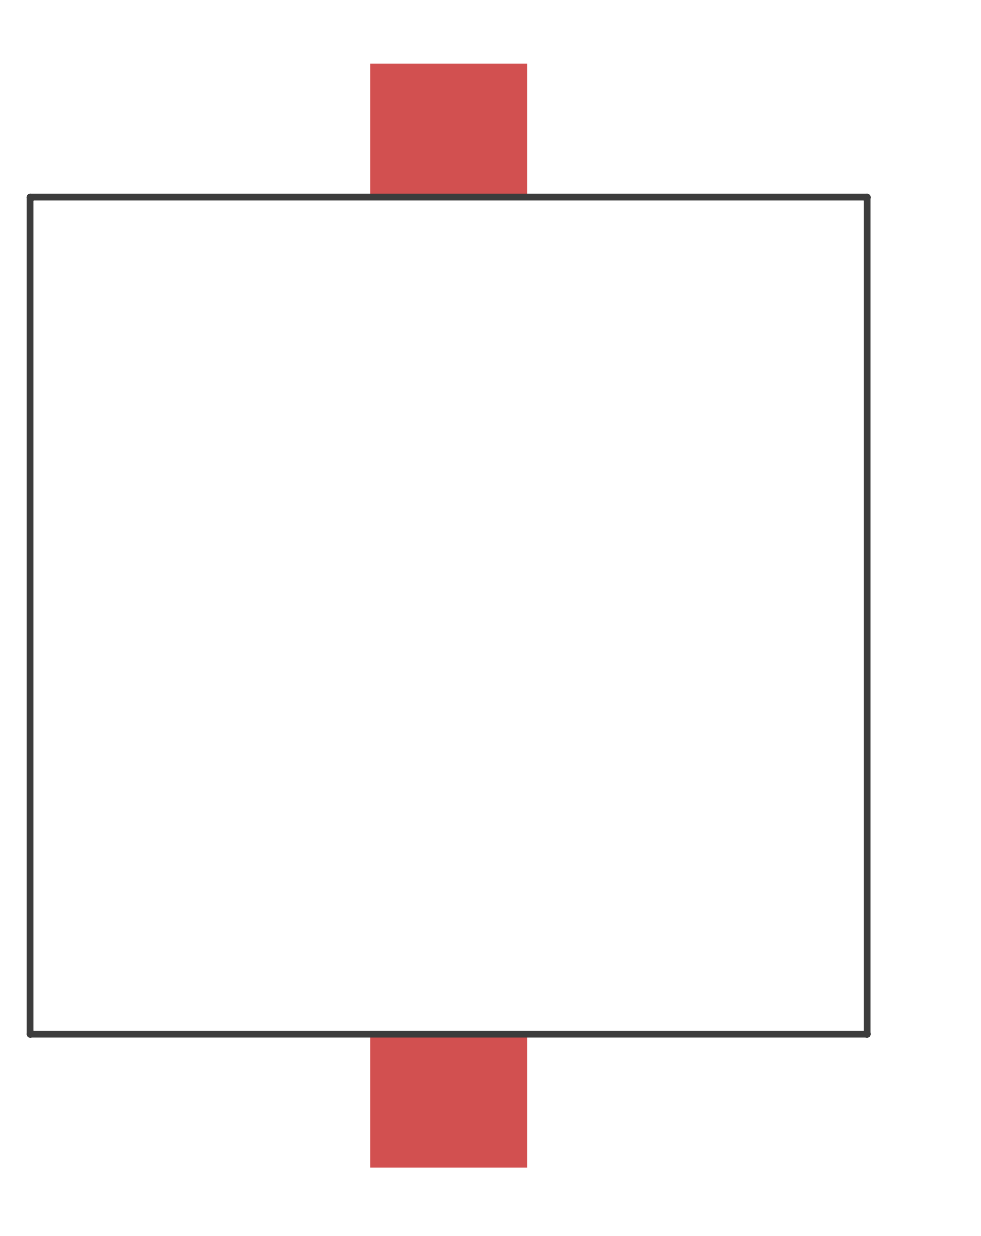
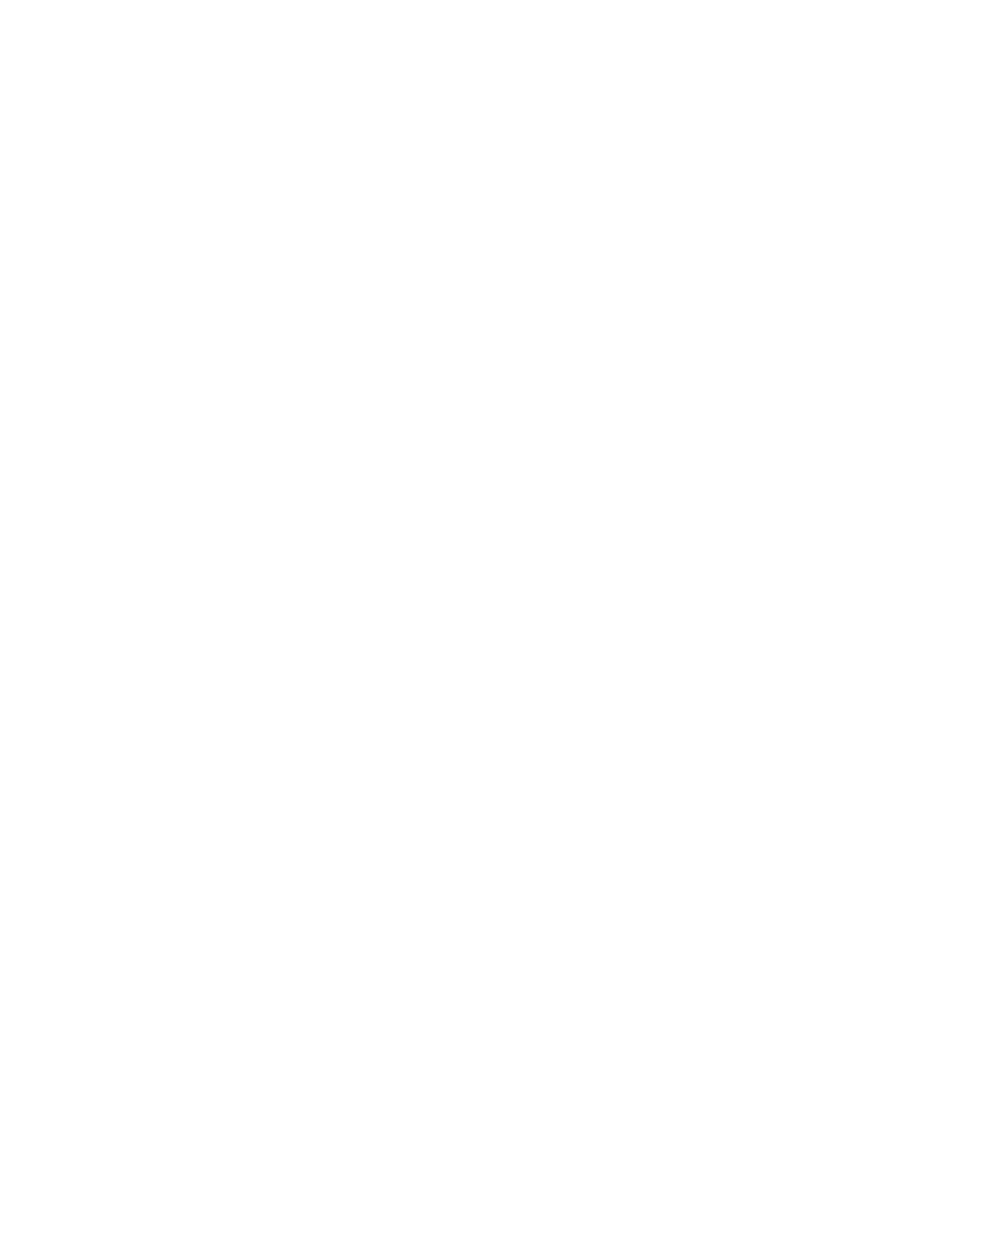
part: (448, 615) -> none

